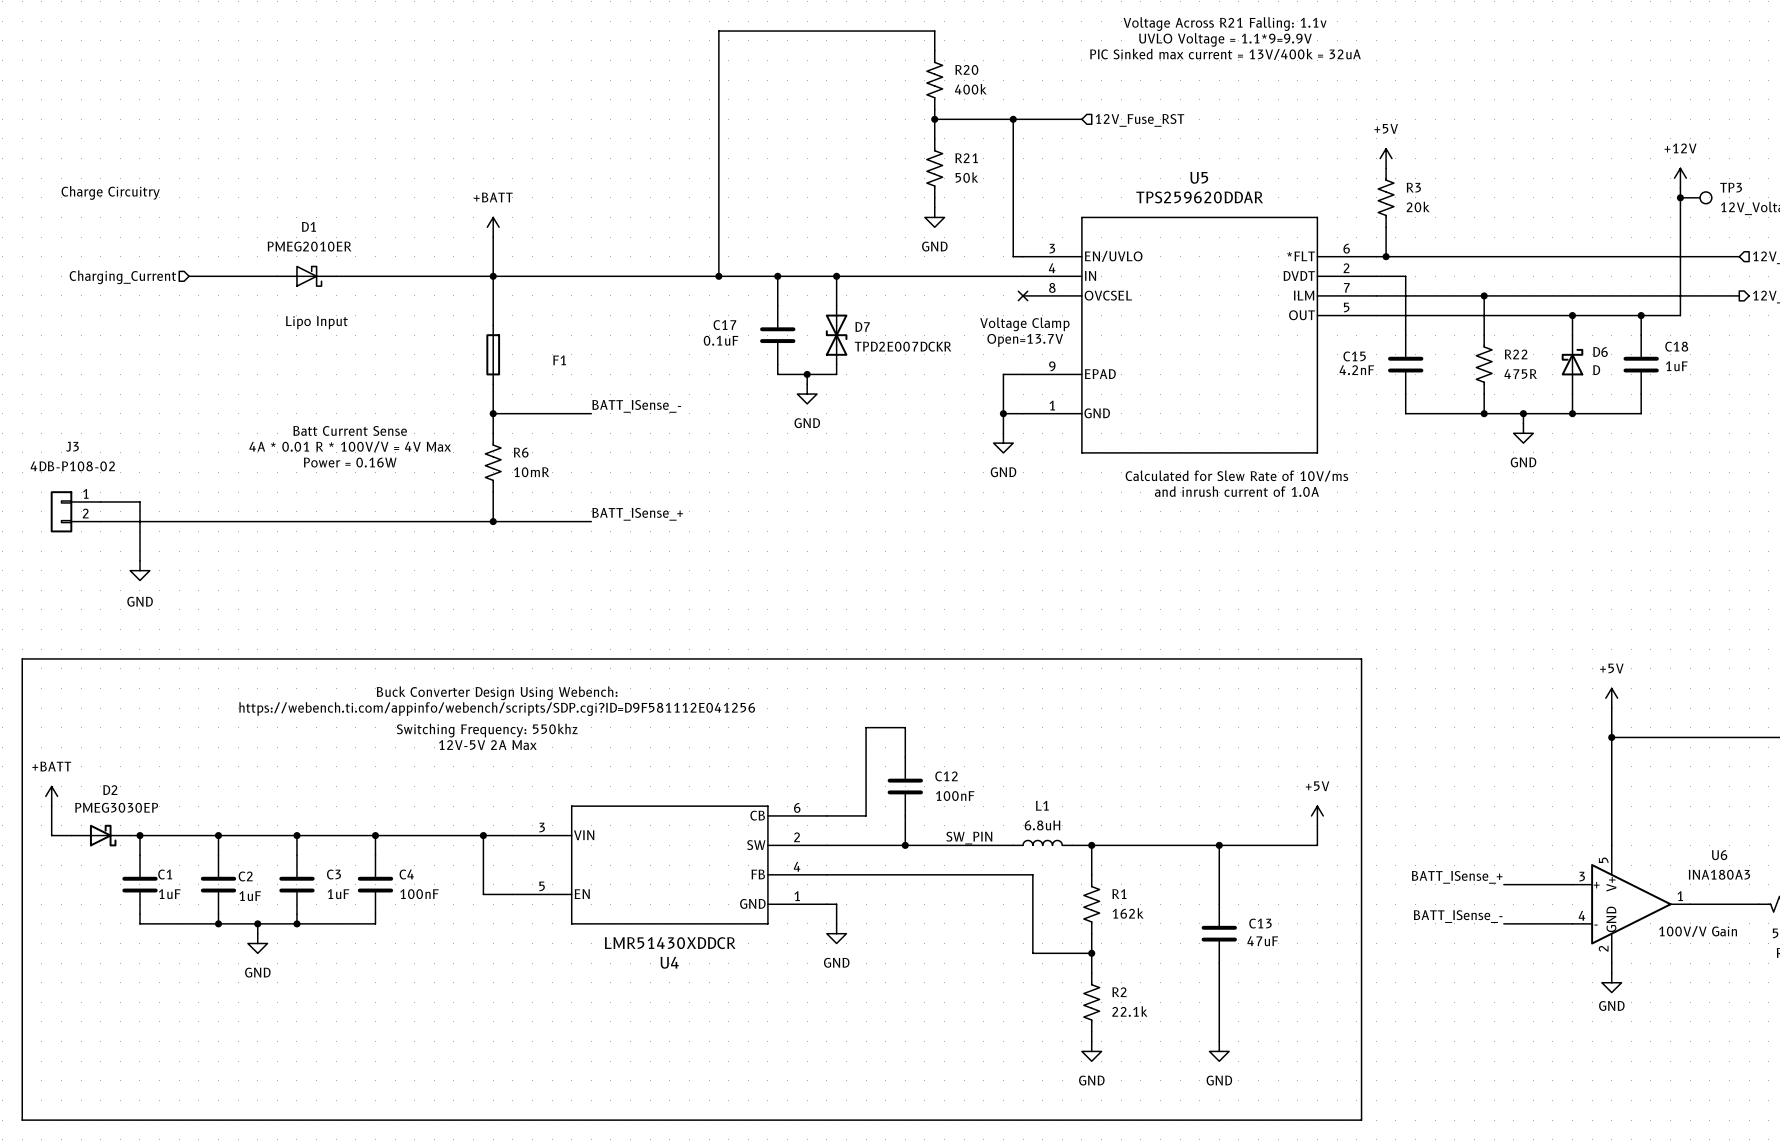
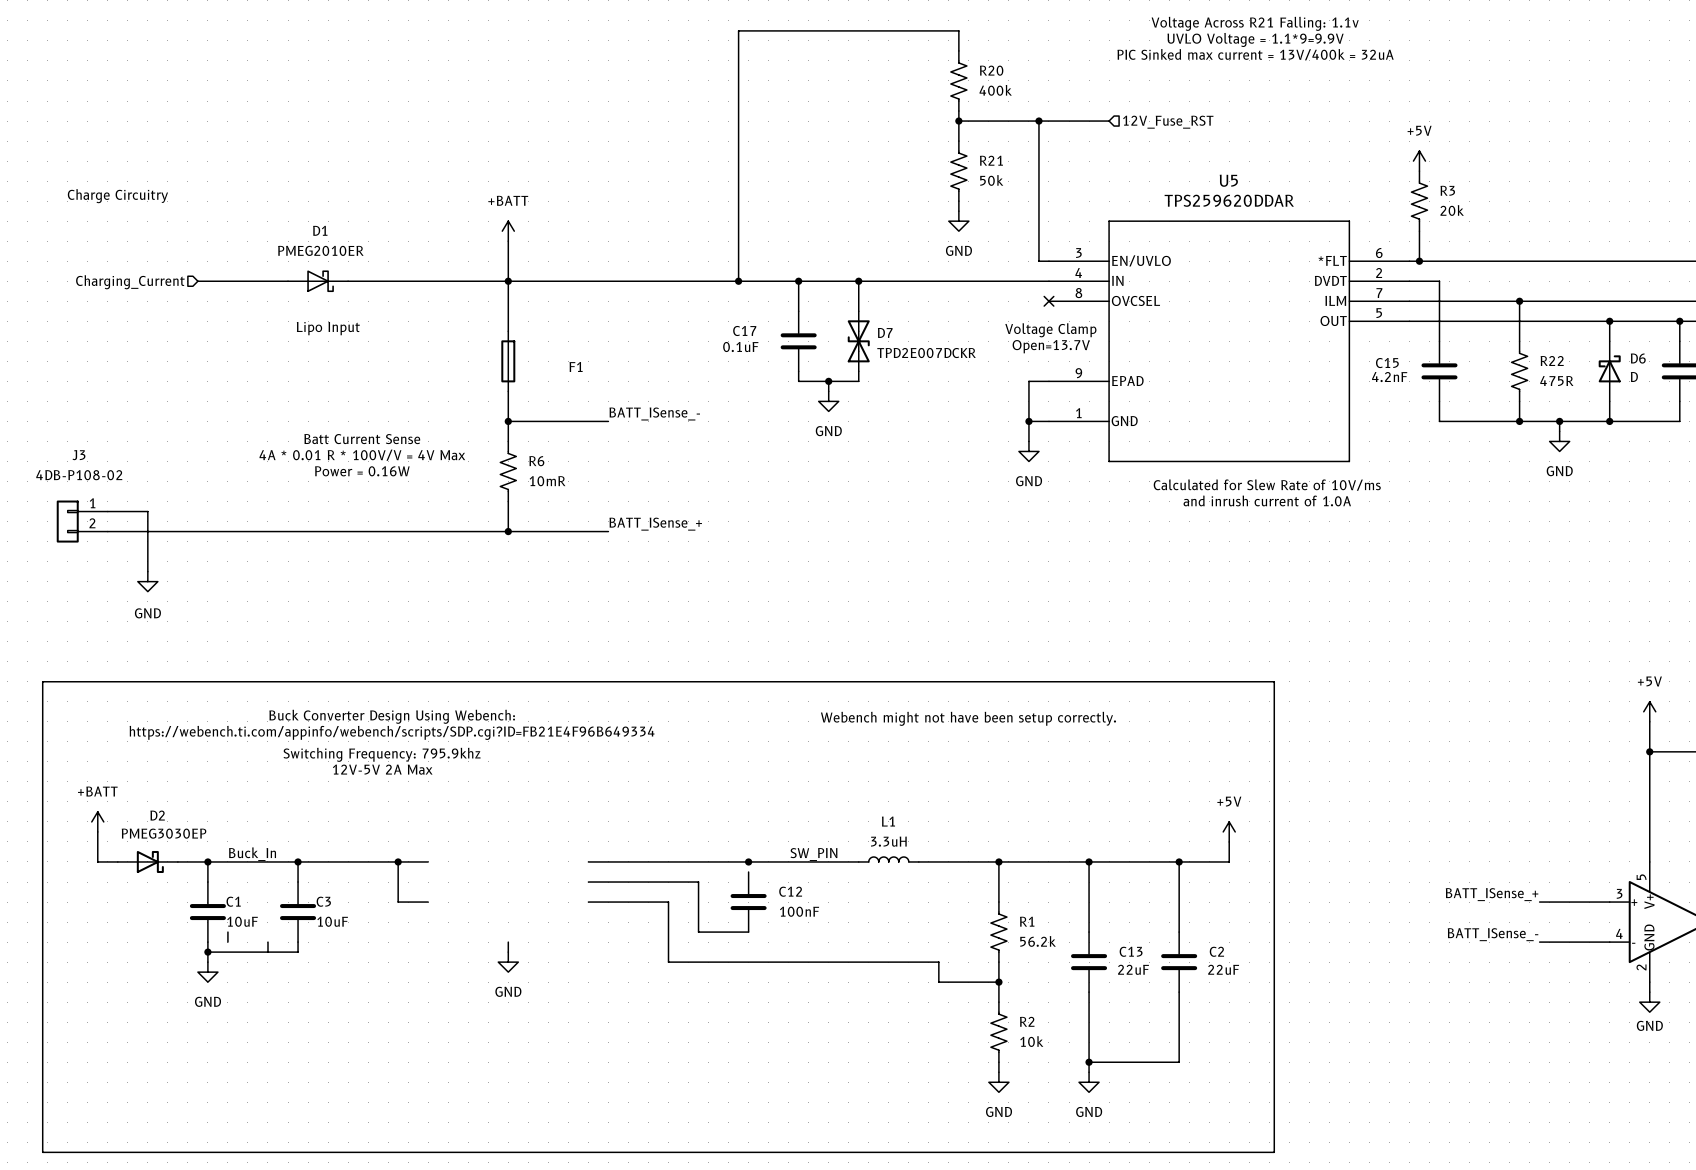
line: (22, 658) (1361, 658) (1361, 1120) (22, 1120) (22, 658) -> (42, 681) (42, 1152) (1274, 1152) (1274, 681) (42, 681)
text position: Buck Converter Design Using Webench: (497, 693) -> Buck Converter Design Using Webench: (392, 716)
text: none -> Webench might not have been setup correctly. (968, 718)
text: https://webench.ti.com/appinfo/webench/scripts/SDP.cgi?ID=D9F581112E041256 (497, 709) -> https://webench.ti.com/appinfo/webench/scripts/SDP.cgi?ID=FB21E4F96B649334 (392, 732)
text: Switching Frequency: 550khz (487, 730) -> Switching Frequency: 795.9khz (382, 754)
text position: 12V-5V 2A Max (487, 745) -> 12V-5V 2A Max (382, 769)
wire: (905, 757) (905, 727) (866, 727) (866, 815) (826, 815) -> none
C12 position: (905, 786) -> (748, 902)
power symbol position: +BATT (51, 796) -> +BATT (97, 821)
wire: (51, 806) (51, 835) (71, 835) -> (97, 831) (97, 861) (117, 861)
wire: (905, 815) (905, 845) -> none
power symbol position: +5V (1317, 815) -> +5V (1229, 831)
L1 value: 6.8uH (1042, 825) -> 3.3uH (888, 841)
wire: (1317, 825) (1317, 845) (1199, 845) -> (1229, 841) (1229, 861)
D2 position: (100, 835) -> (147, 861)
wire: (130, 835) (512, 835) -> none
wire: (139, 835) (139, 855) -> (207, 942) (207, 962)
junction: (139, 835) -> none
wire: (218, 835) (218, 855) -> (207, 861) (207, 882)
junction position: (218, 835) -> (207, 861)
wire: (296, 835) (296, 855) -> (298, 861) (298, 882)
junction position: (296, 835) -> (298, 861)
wire: (375, 835) (375, 855) -> none
junction position: (375, 835) -> (398, 861)
wire: (483, 835) (483, 894) (512, 894) -> none
junction: (483, 835) -> none
label: none -> Buck_In (252, 854)
label position: SW_PIN (969, 838) -> SW_PIN (813, 854)
L1 position: (1042, 842) -> (888, 859)
wire: none -> (177, 861) (428, 861)
wire: none -> (398, 861) (398, 902) (428, 902)
wire: none -> (588, 861) (848, 861)
junction: none -> (748, 861)
wire: (836, 845) (895, 845) -> (1038, 861) (1099, 861)
junction: (905, 845) -> none
wire: none -> (998, 861) (998, 902)
junction: none -> (998, 861)
wire: none -> (1089, 861) (1089, 932)
junction: none -> (1089, 861)
wire: (1091, 845) (1091, 874) -> none
junction: (1091, 845) -> none
wire: none -> (1179, 861) (1179, 932)
junction: none -> (1179, 861)
wire: (1219, 845) (1219, 904) -> none
junction: (1219, 845) -> none
wire: none -> (588, 882) (698, 882) (698, 932) (748, 932)
U4: LMR51430XDDCR (669, 865) -> none
C3 name position: C3 (333, 874) -> C3 (323, 901)
wire: (826, 874) (1032, 874) (1032, 953) (1091, 953) -> none
C2 name position: C2 (245, 876) -> C2 (1216, 951)
C1 position: (139, 884) -> (207, 912)
C2 position: (218, 884) -> (1179, 962)
C3 position: (296, 884) -> (298, 912)
C4: 100nF (375, 884) -> none
wire: none -> (588, 902) (668, 902) (668, 962) (938, 962) (938, 982) (998, 982)
C1 value: 1uF (169, 894) -> 10uF (242, 921)
C3 value: 1uF (338, 894) -> 10uF (332, 921)
C2 value: 1uF (250, 896) -> 22uF (1223, 969)
wire: (826, 904) (836, 904) (836, 923) -> none
R1 position: (1091, 904) -> (998, 932)
R1 value: 162k (1128, 913) -> 56.2k (1038, 941)
wire: (139, 914) (139, 923) (375, 923) (375, 914) -> none
wire: (296, 914) (296, 923) -> none
junction position: (218, 923) -> (207, 952)
junction: (257, 923) -> none
wire: none -> (298, 942) (298, 952) (207, 952)
junction: (296, 923) -> none
wire: none -> (508, 942) (508, 952)
power symbol: GND (836, 933) -> none
wire: (1091, 933) (1091, 972) -> (998, 962) (998, 1002)
C13 position: (1219, 933) -> (1089, 962)
C13 value: 47uF (1262, 941) -> 22uF (1133, 969)
power symbol position: GND (257, 943) -> GND (207, 972)
power symbol: none -> GND (508, 962)
junction: (1091, 953) -> none
junction: none -> (998, 982)
wire: (1219, 963) (1219, 1041) -> (1089, 992) (1089, 1072)
wire: none -> (1179, 992) (1179, 1062) (1089, 1062)
R2 position: (1091, 1002) -> (998, 1032)
R2 value: 22.1k (1129, 1011) -> 10k (1031, 1041)
wire: (1091, 1031) (1091, 1041) -> (998, 1062) (998, 1072)
junction: none -> (1089, 1062)
power symbol position: GND (1091, 1051) -> GND (1089, 1082)
power symbol: GND (1219, 1051) -> none
power symbol: none -> GND (998, 1082)

